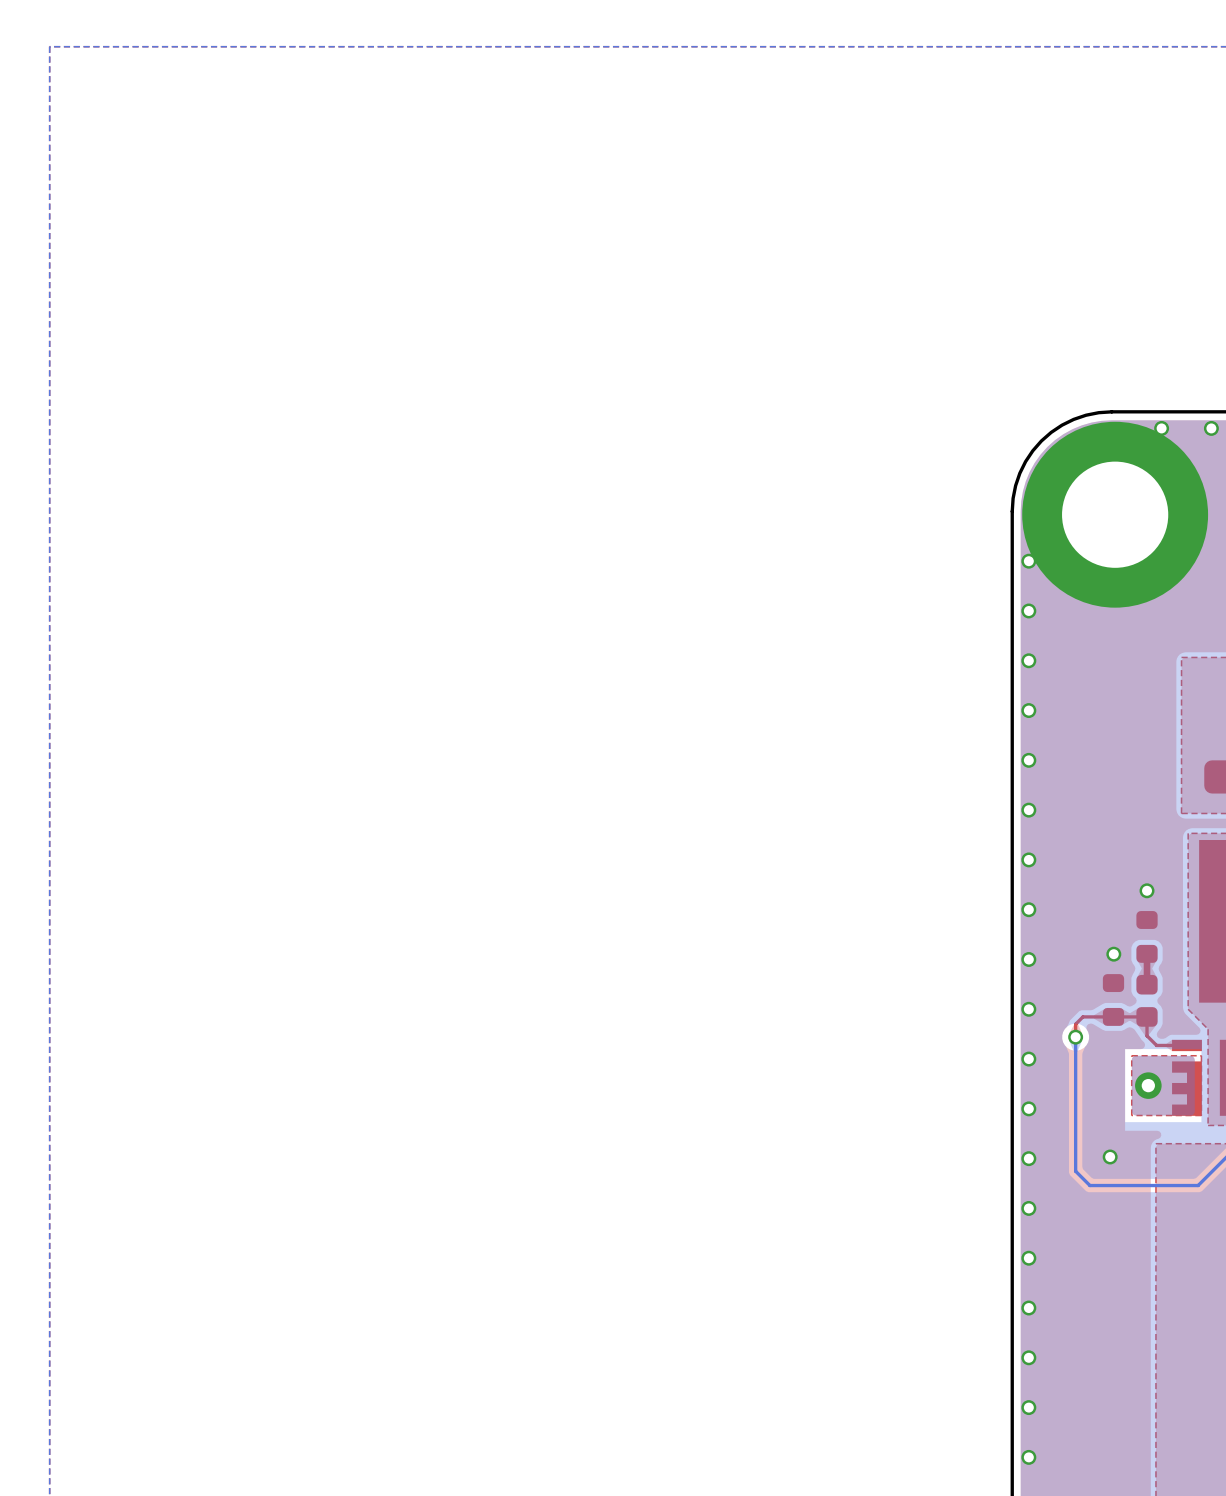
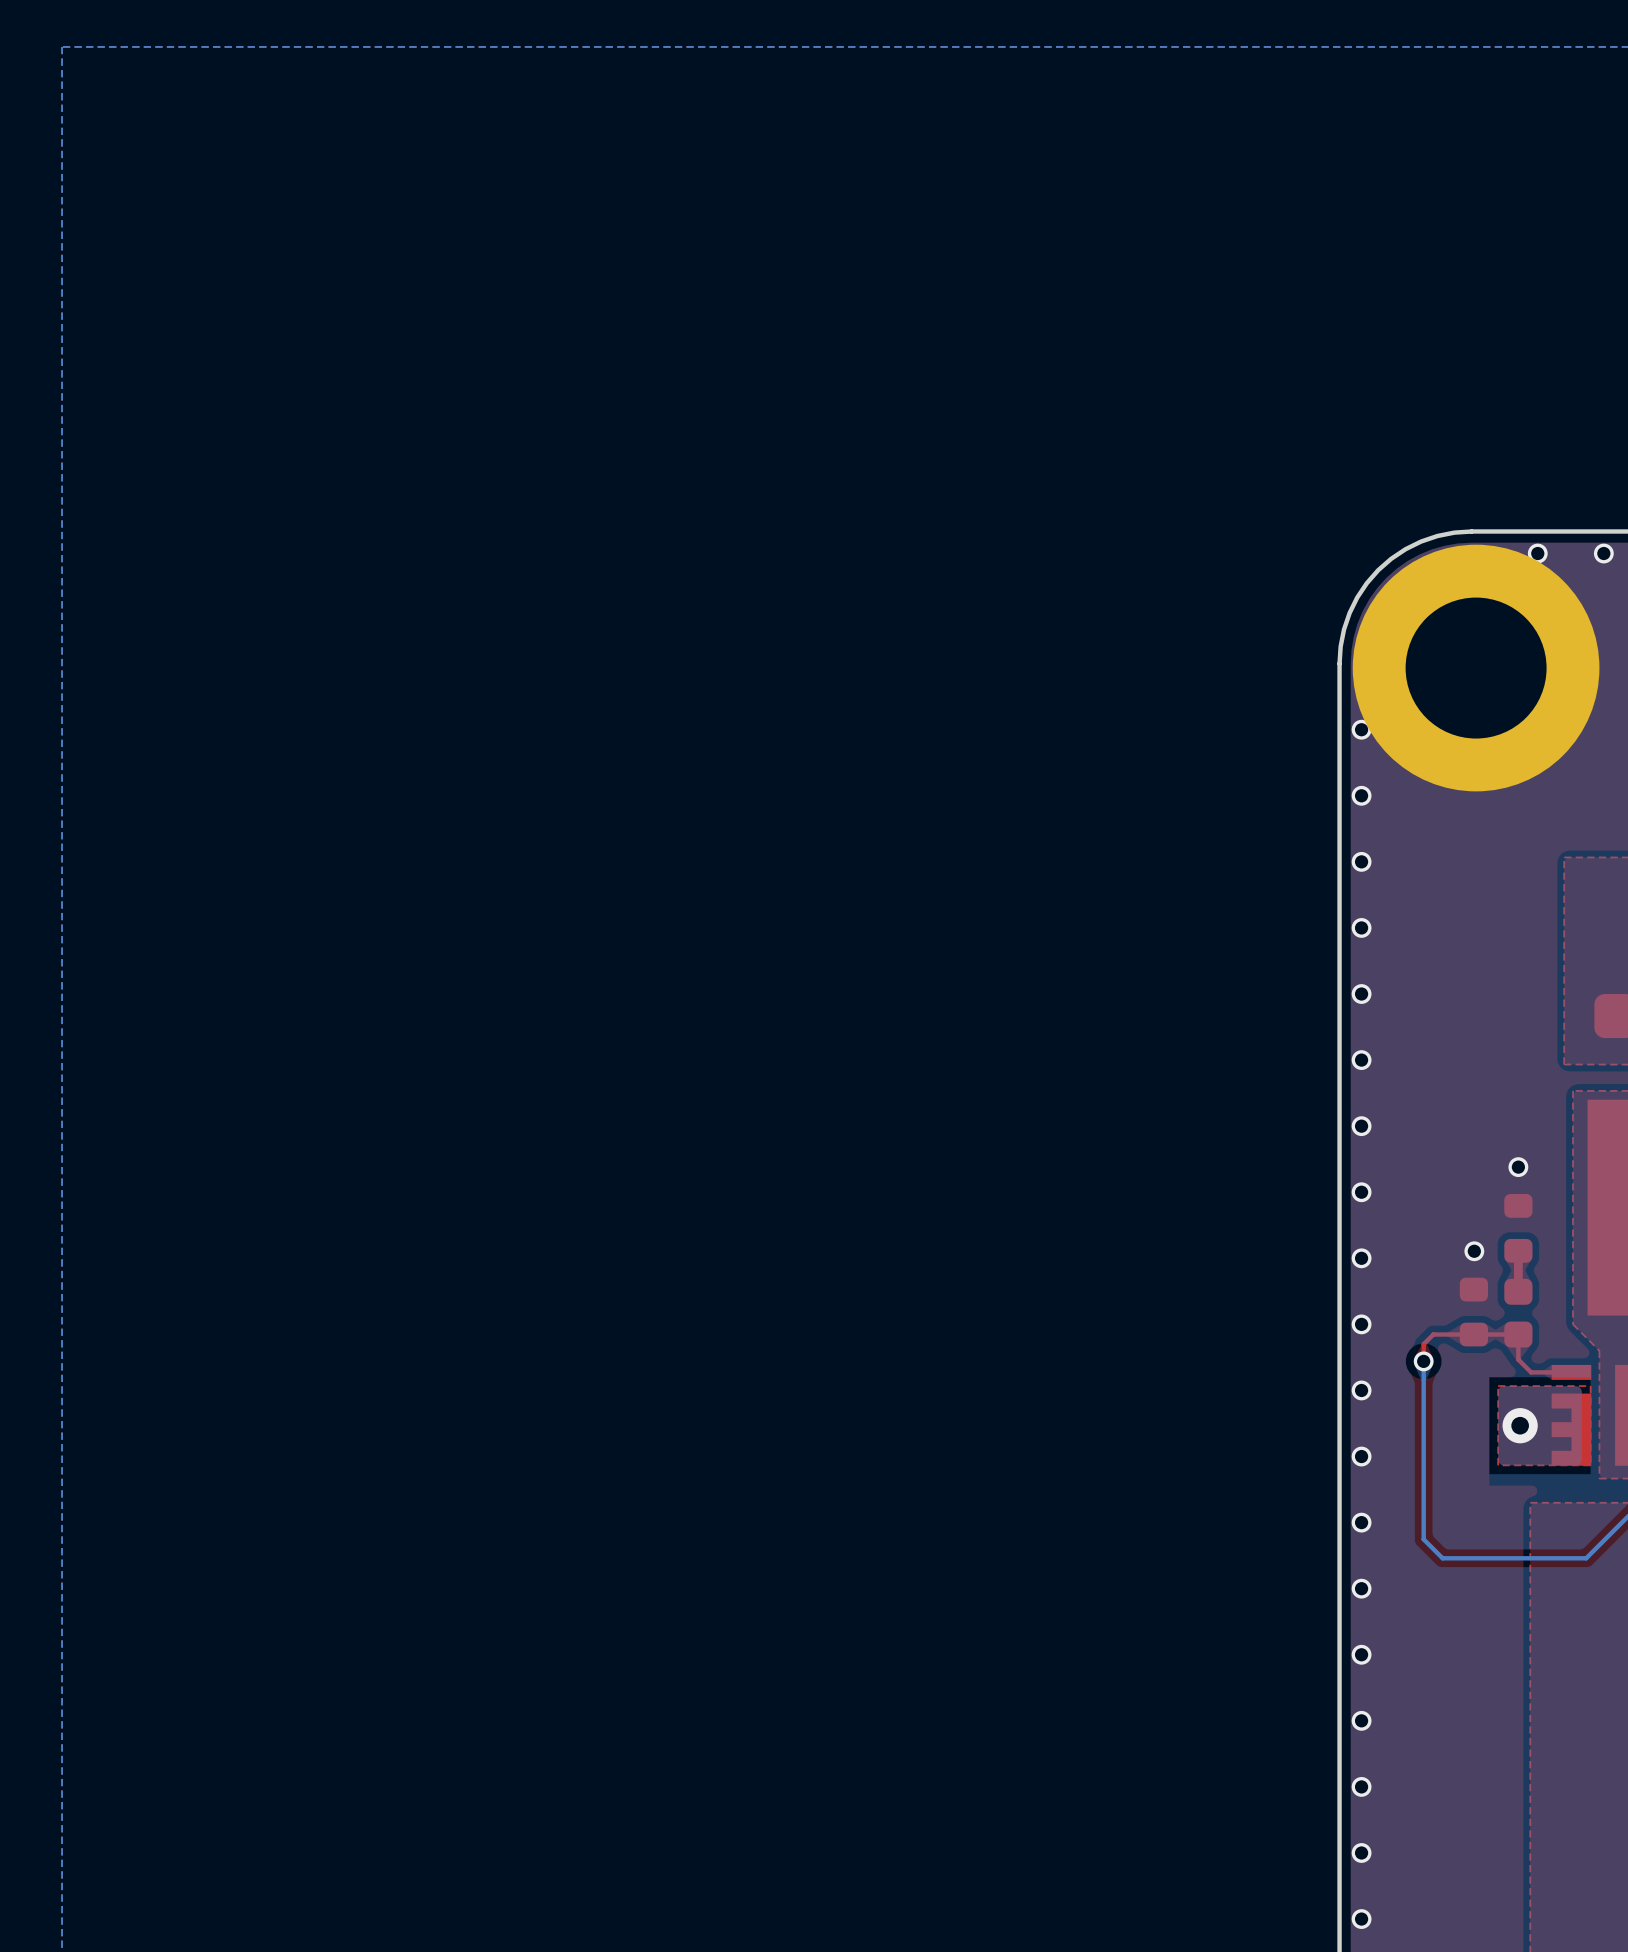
via: (1110, 1156) -> none

